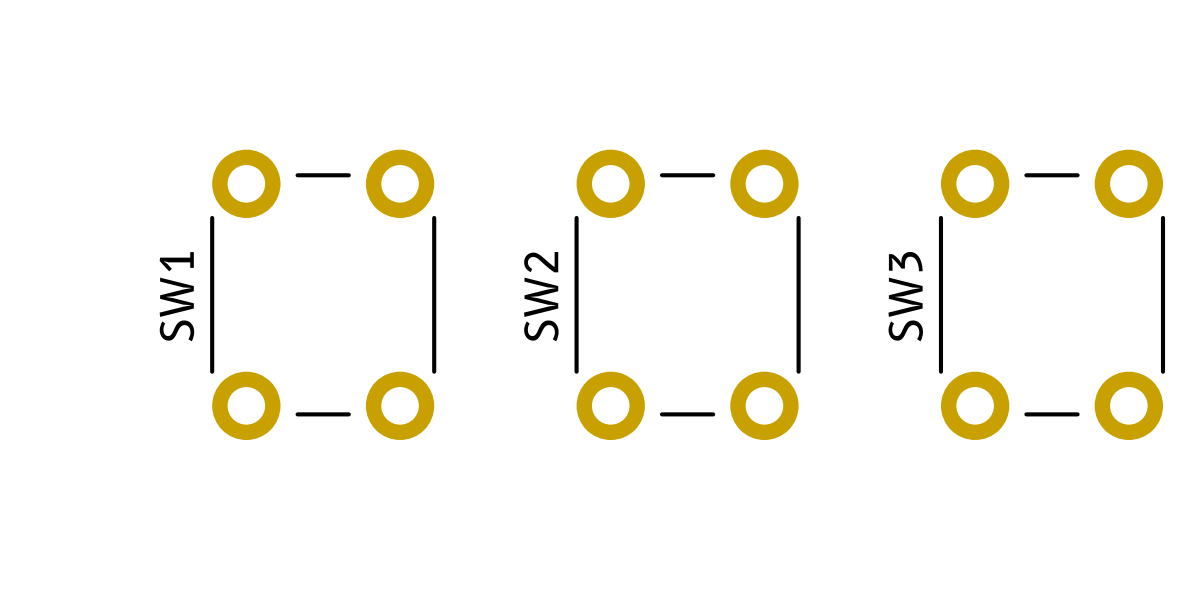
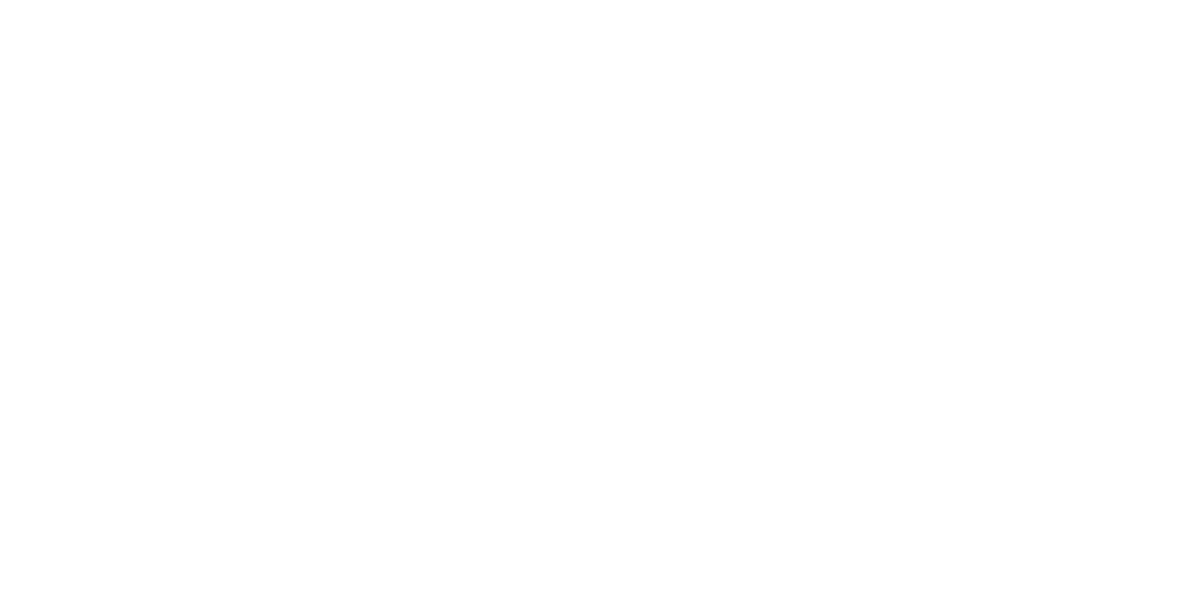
SW1: (323, 294) -> none
SW2: (687, 294) -> none
SW3: (1051, 294) -> none

